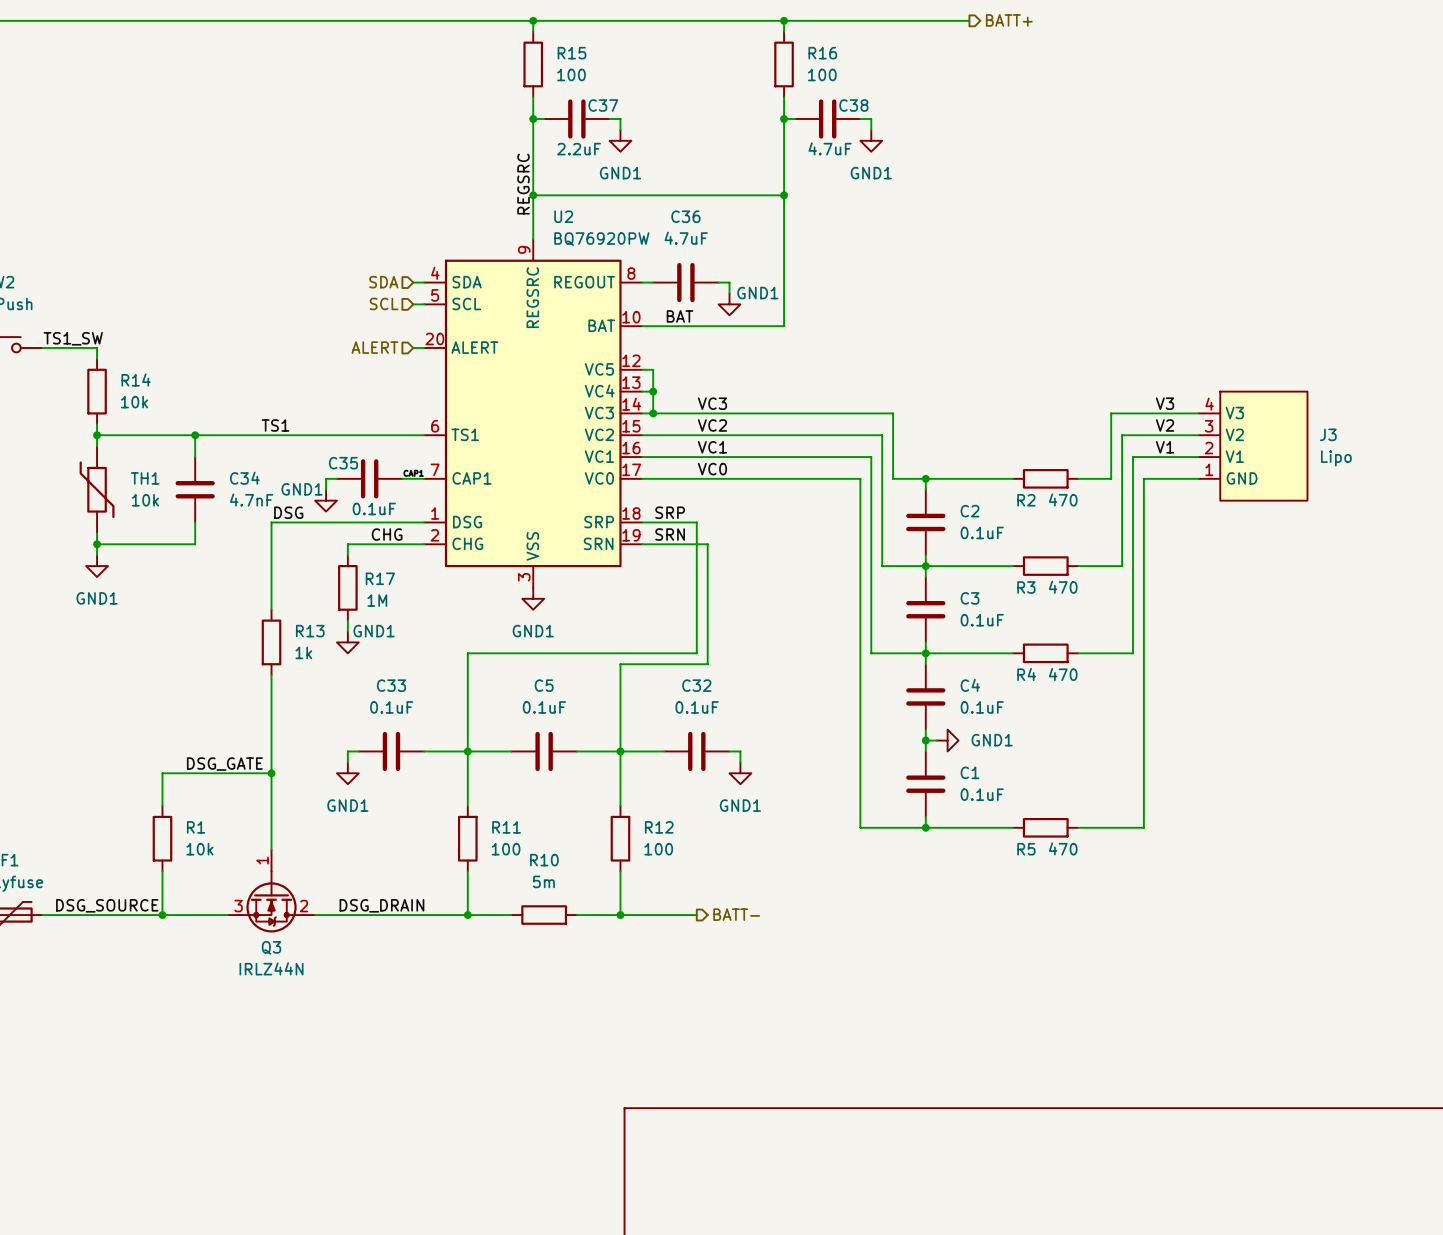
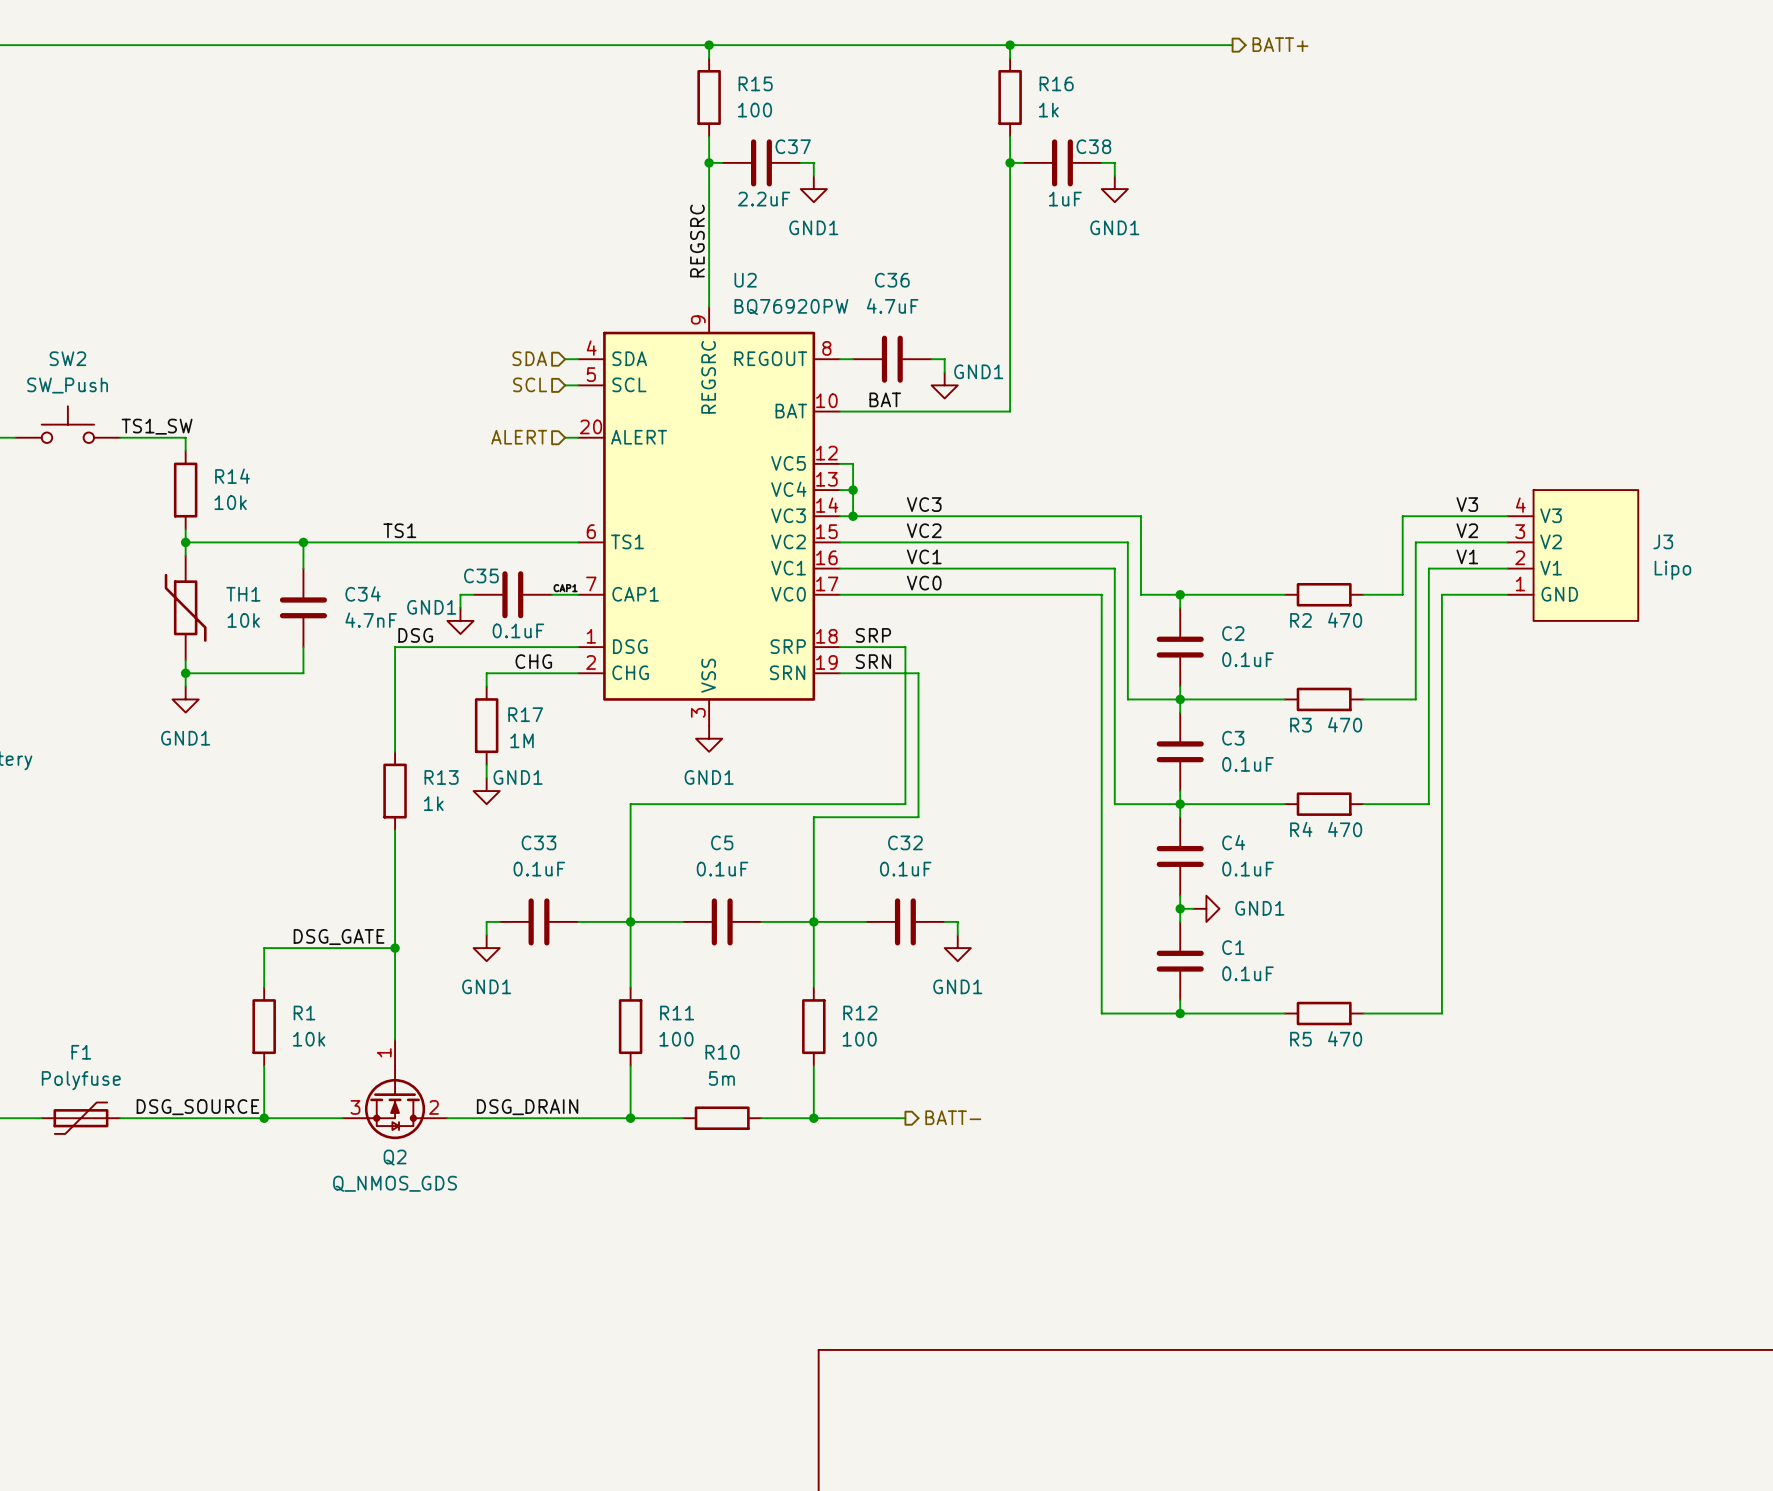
R16 value: 100 (822, 74) -> 1k (1048, 110)
C38 value: 4.7uF (830, 148) -> 1uF (1065, 199)
wire: (533, 195) (784, 195) -> none
junction: (533, 195) -> none
junction: (784, 195) -> none
Q3: IRLZ44N (271, 891) -> none
Q2: none -> Q_NMOS_GDS (395, 1089)

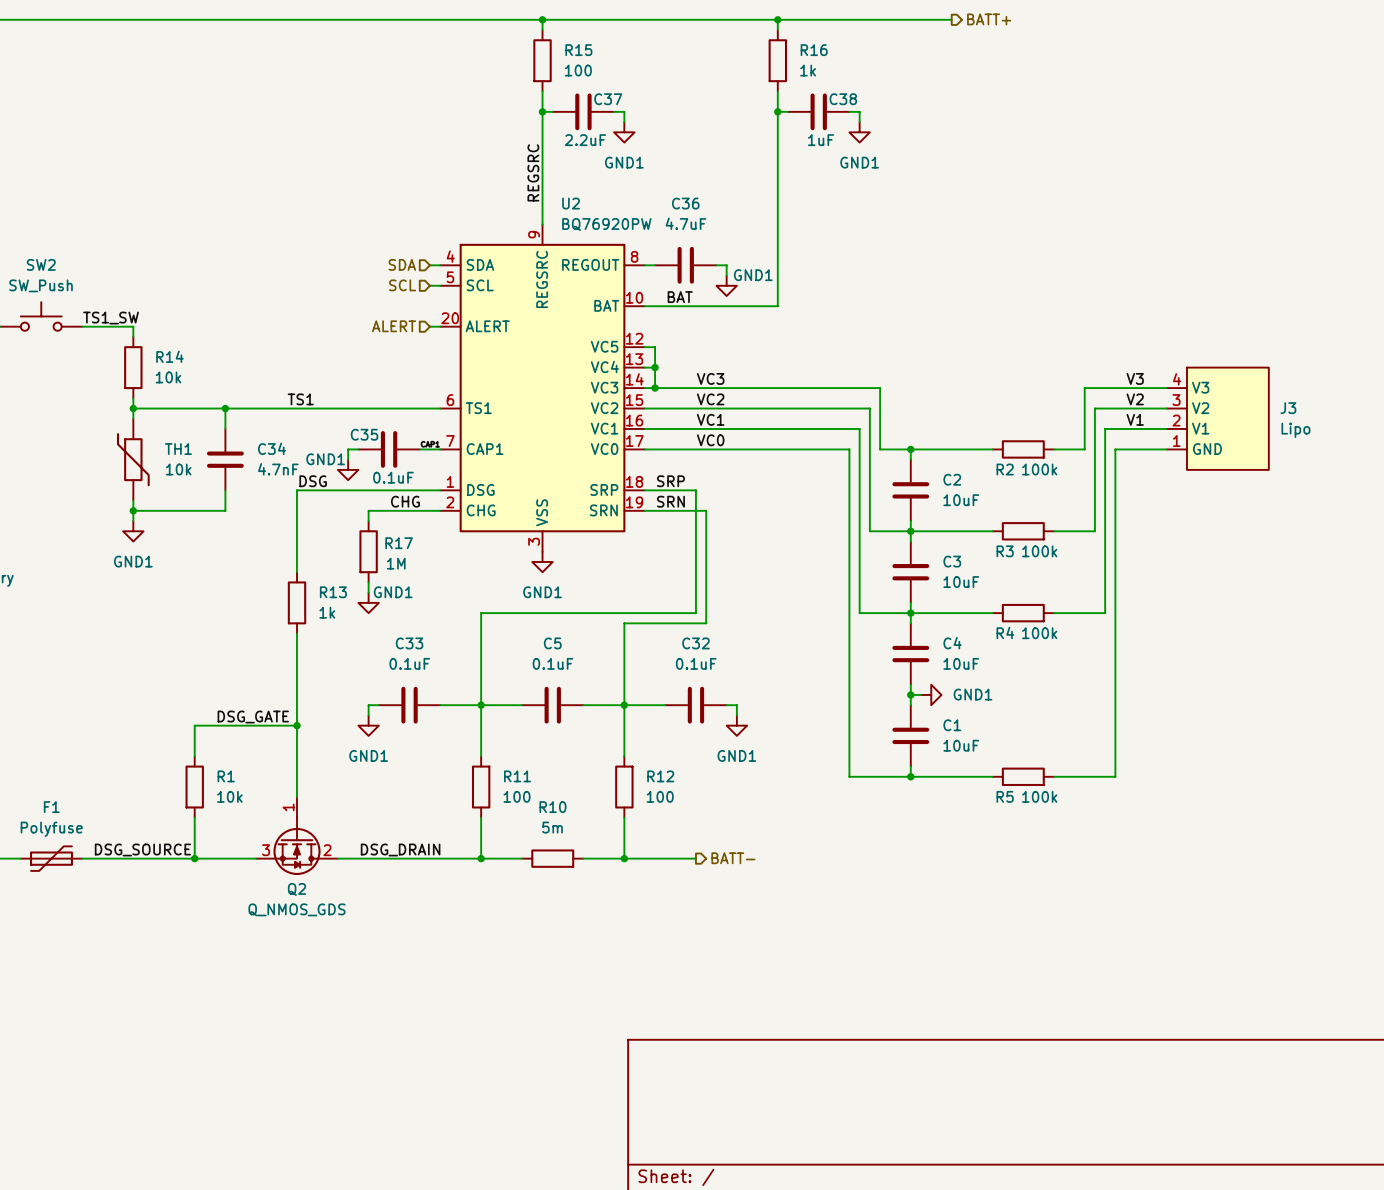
R2 value: 470 (1345, 620) -> 100k (1039, 469)
C2 value: 0.1uF (1247, 659) -> 10uF (961, 500)
R3 value: 470 (1345, 724) -> 100k (1039, 551)
C3 value: 0.1uF (1247, 764) -> 10uF (961, 582)
R4 value: 470 (1345, 829) -> 100k (1039, 633)
C4 value: 0.1uF (1247, 869) -> 10uF (961, 663)
C1 value: 0.1uF (1247, 973) -> 10uF (961, 745)
R5 value: 470 (1345, 1038) -> 100k (1039, 796)

